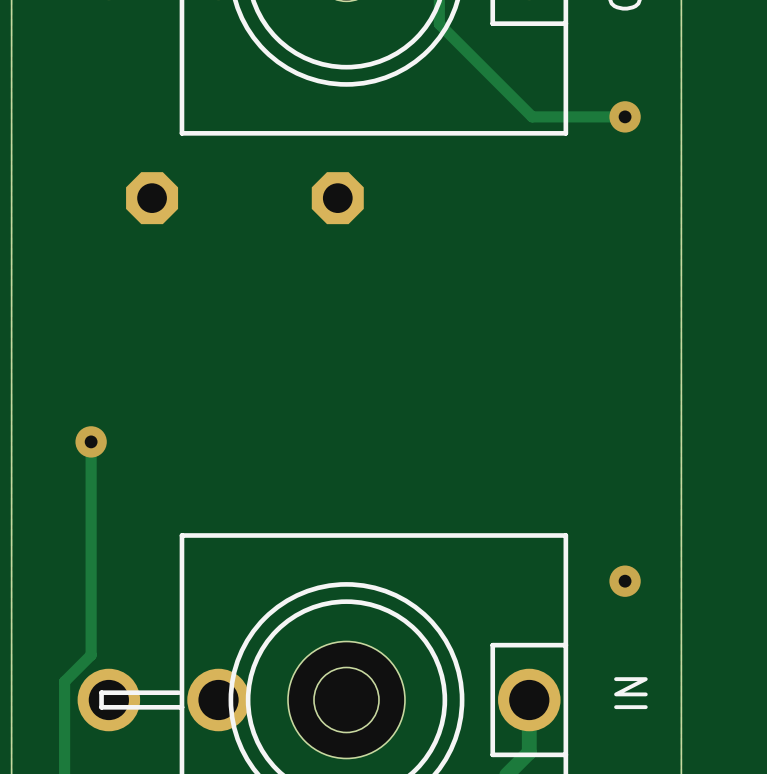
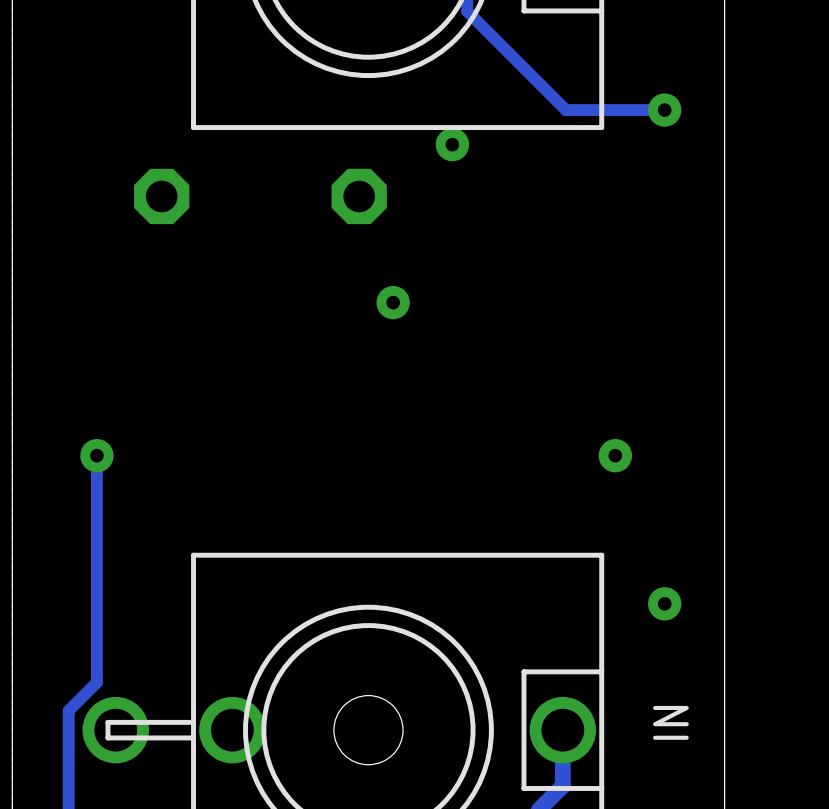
via: none -> (452, 144)
via: none -> (393, 302)
via: none -> (615, 455)
hole: (346, 700) -> none

